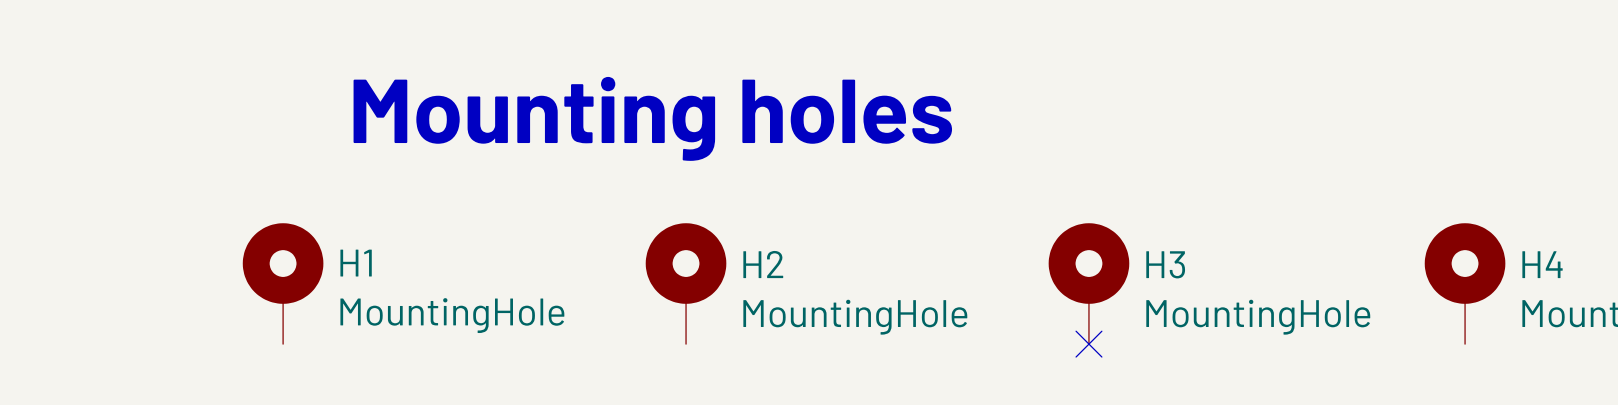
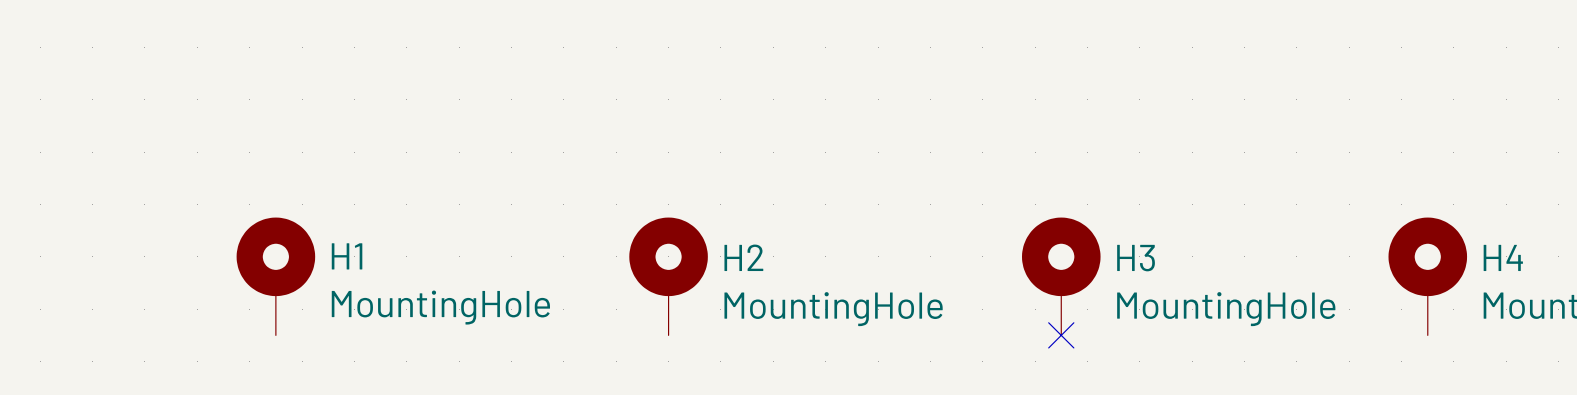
text: Mounting holes (652, 118) -> none

